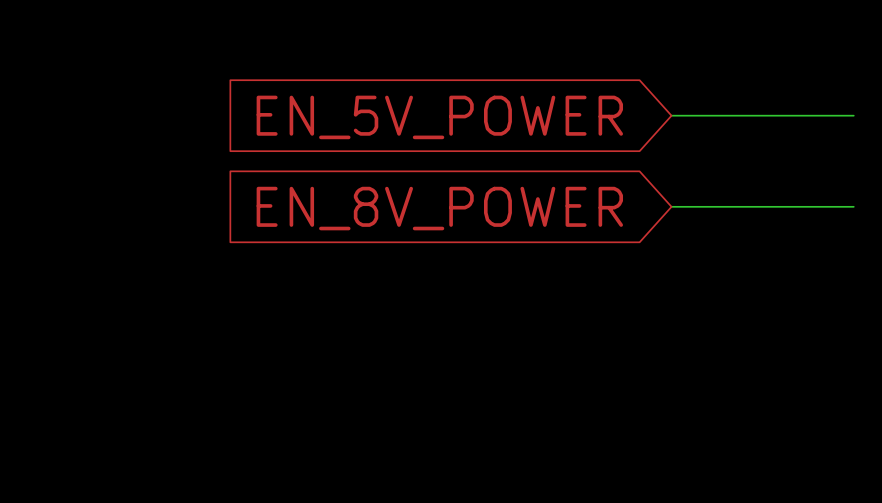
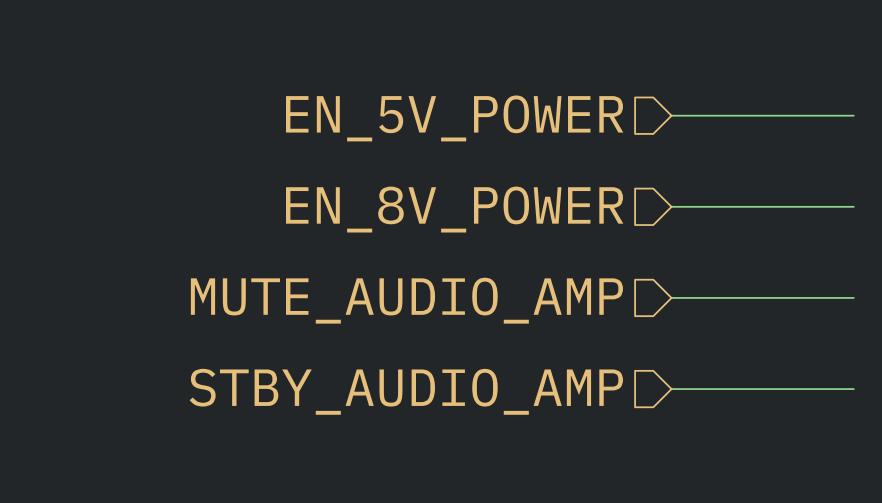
hierarchical label: none -> EN_5V_POWER (454, 118)
global label: EN_5V_POWER (439, 117) -> none
hierarchical label: none -> EN_8V_POWER (454, 209)
global label: EN_8V_POWER (439, 208) -> none
wire: none -> (671, 297) (853, 297)
hierarchical label: none -> MUTE_AUDIO_AMP (406, 300)
hierarchical label: none -> STBY_AUDIO_AMP (406, 391)
wire: none -> (671, 389) (853, 389)

